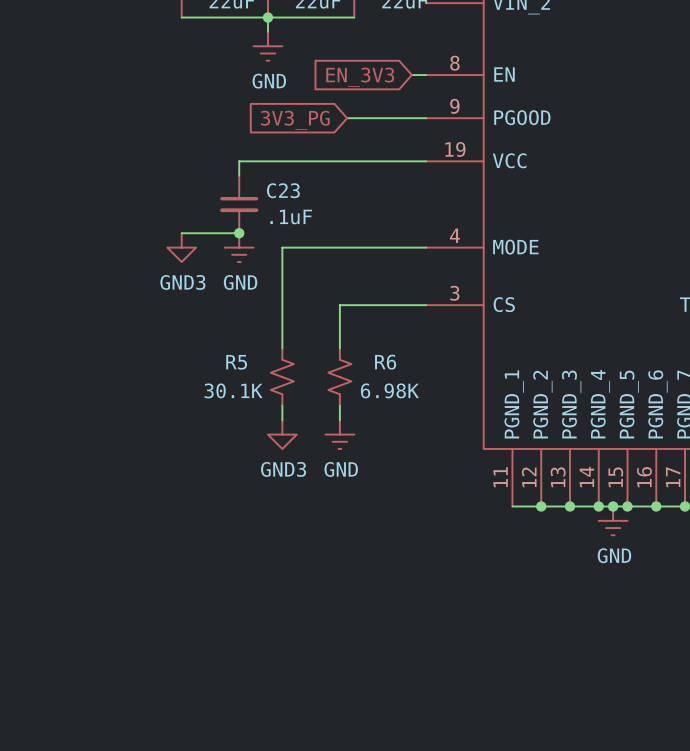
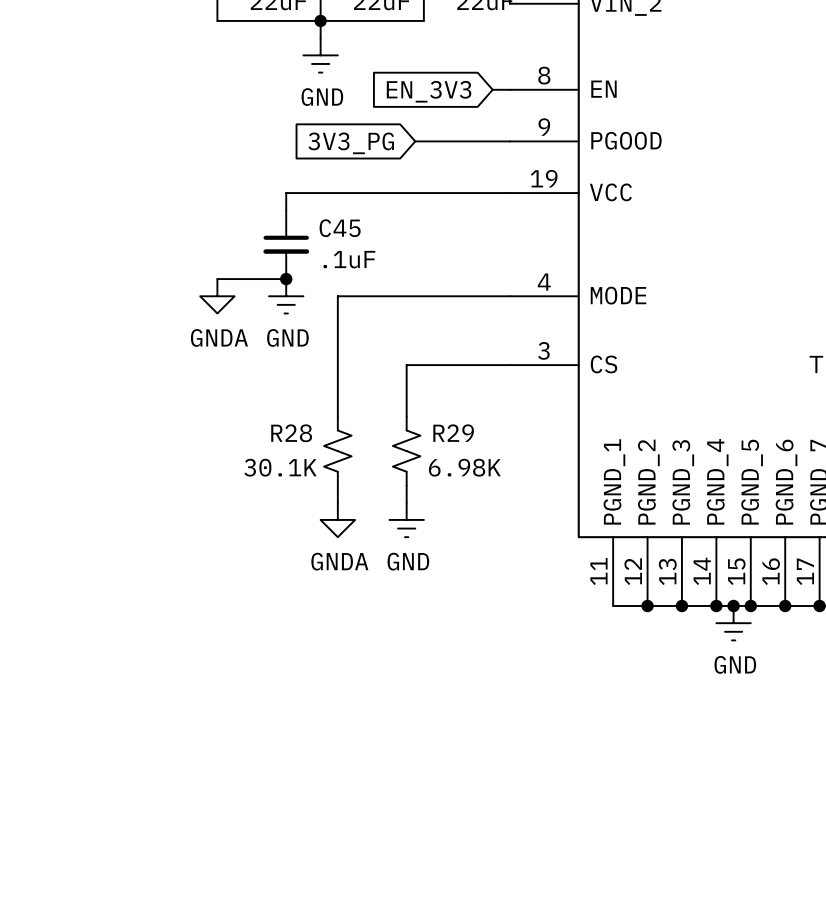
C23 name: C23 (283, 190) -> C45 (340, 228)
power symbol: GND3 (181, 247) -> GNDA (217, 296)
R5 name: R5 (236, 362) -> R28 (291, 433)
R6 name: R6 (385, 362) -> R29 (453, 433)
power symbol: GND3 (282, 434) -> GNDA (337, 519)

